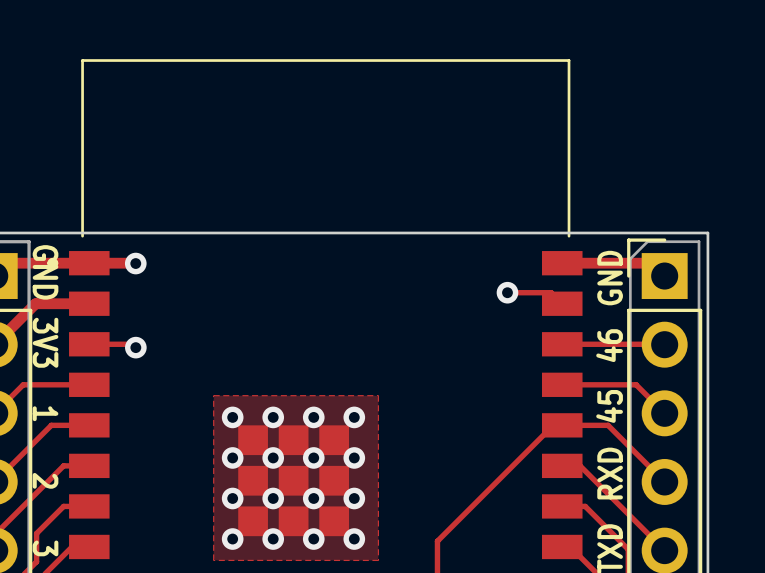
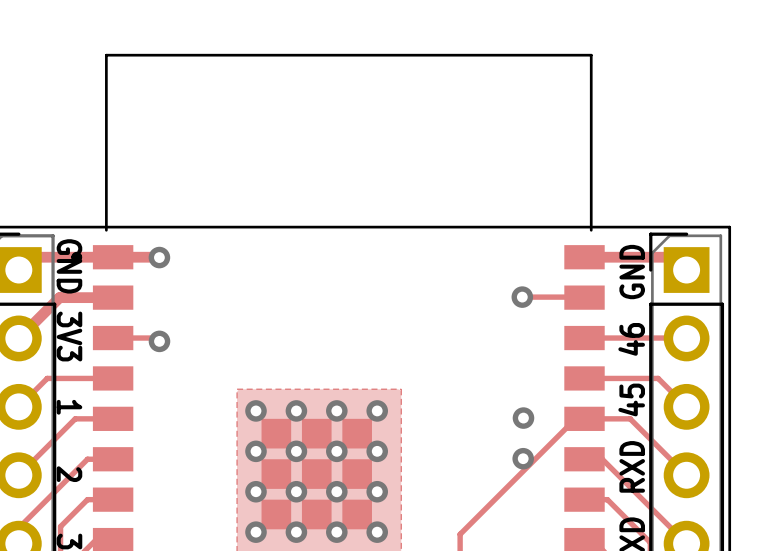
track: (507, 292) (551, 292) (561, 303) -> (522, 297) (583, 297)
via position: (507, 292) -> (522, 297)
via: none -> (523, 418)
via: none -> (523, 458)

